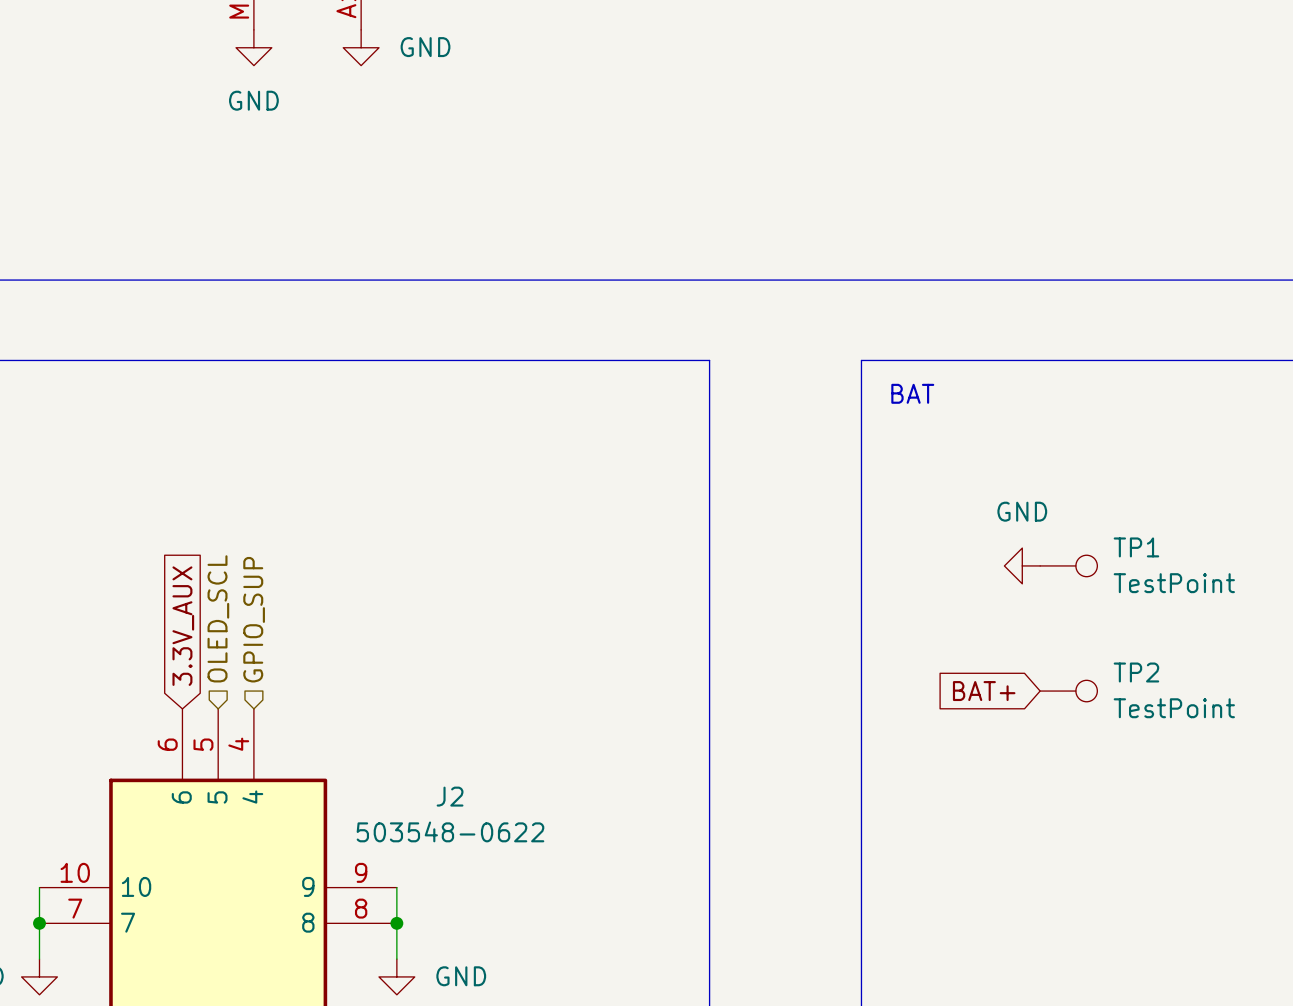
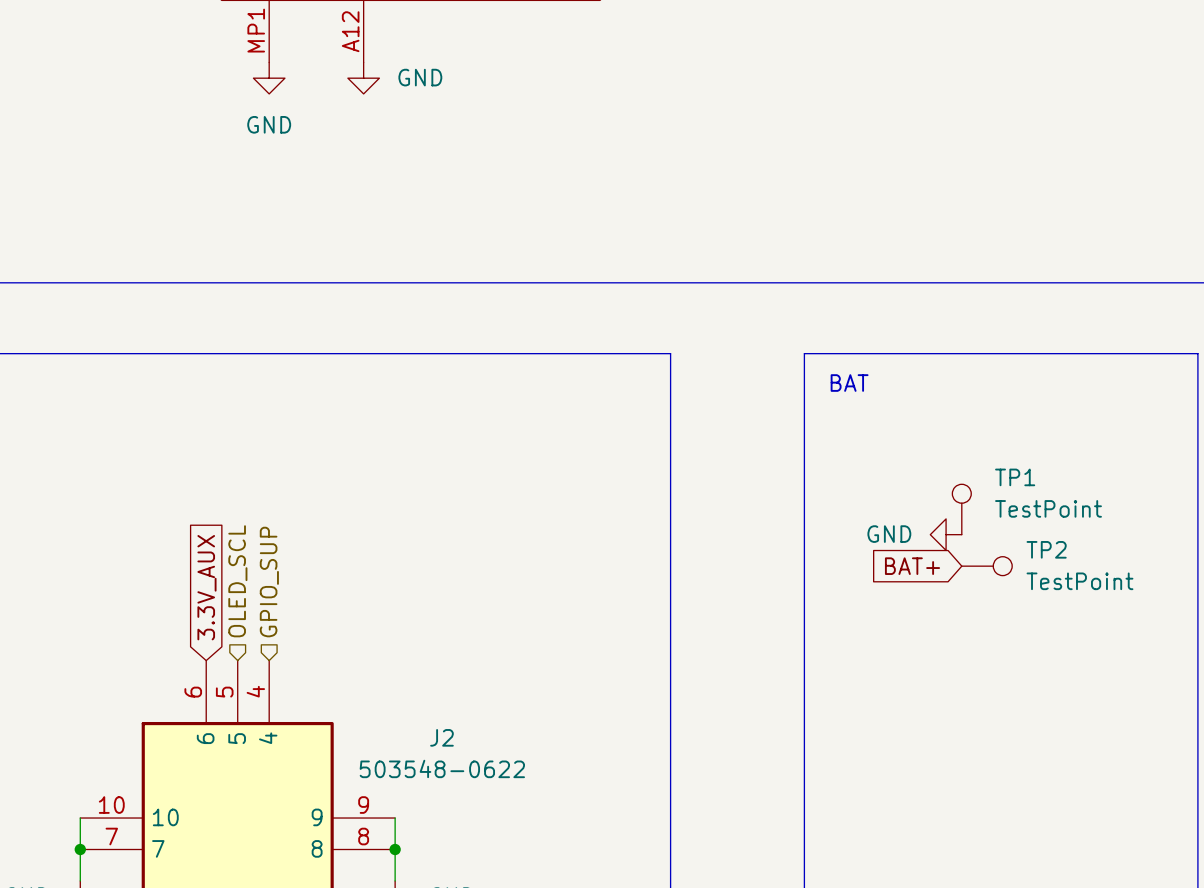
power symbol text position: GND (1022, 511) -> GND (889, 534)
TP1 position: (1068, 565) -> (961, 509)
TP1 rotation: 0° (1086, 565) -> 90° counterclockwise (961, 493)
global label position: BAT+ (984, 691) -> BAT+ (912, 566)
TP2 position: (1068, 691) -> (986, 566)

